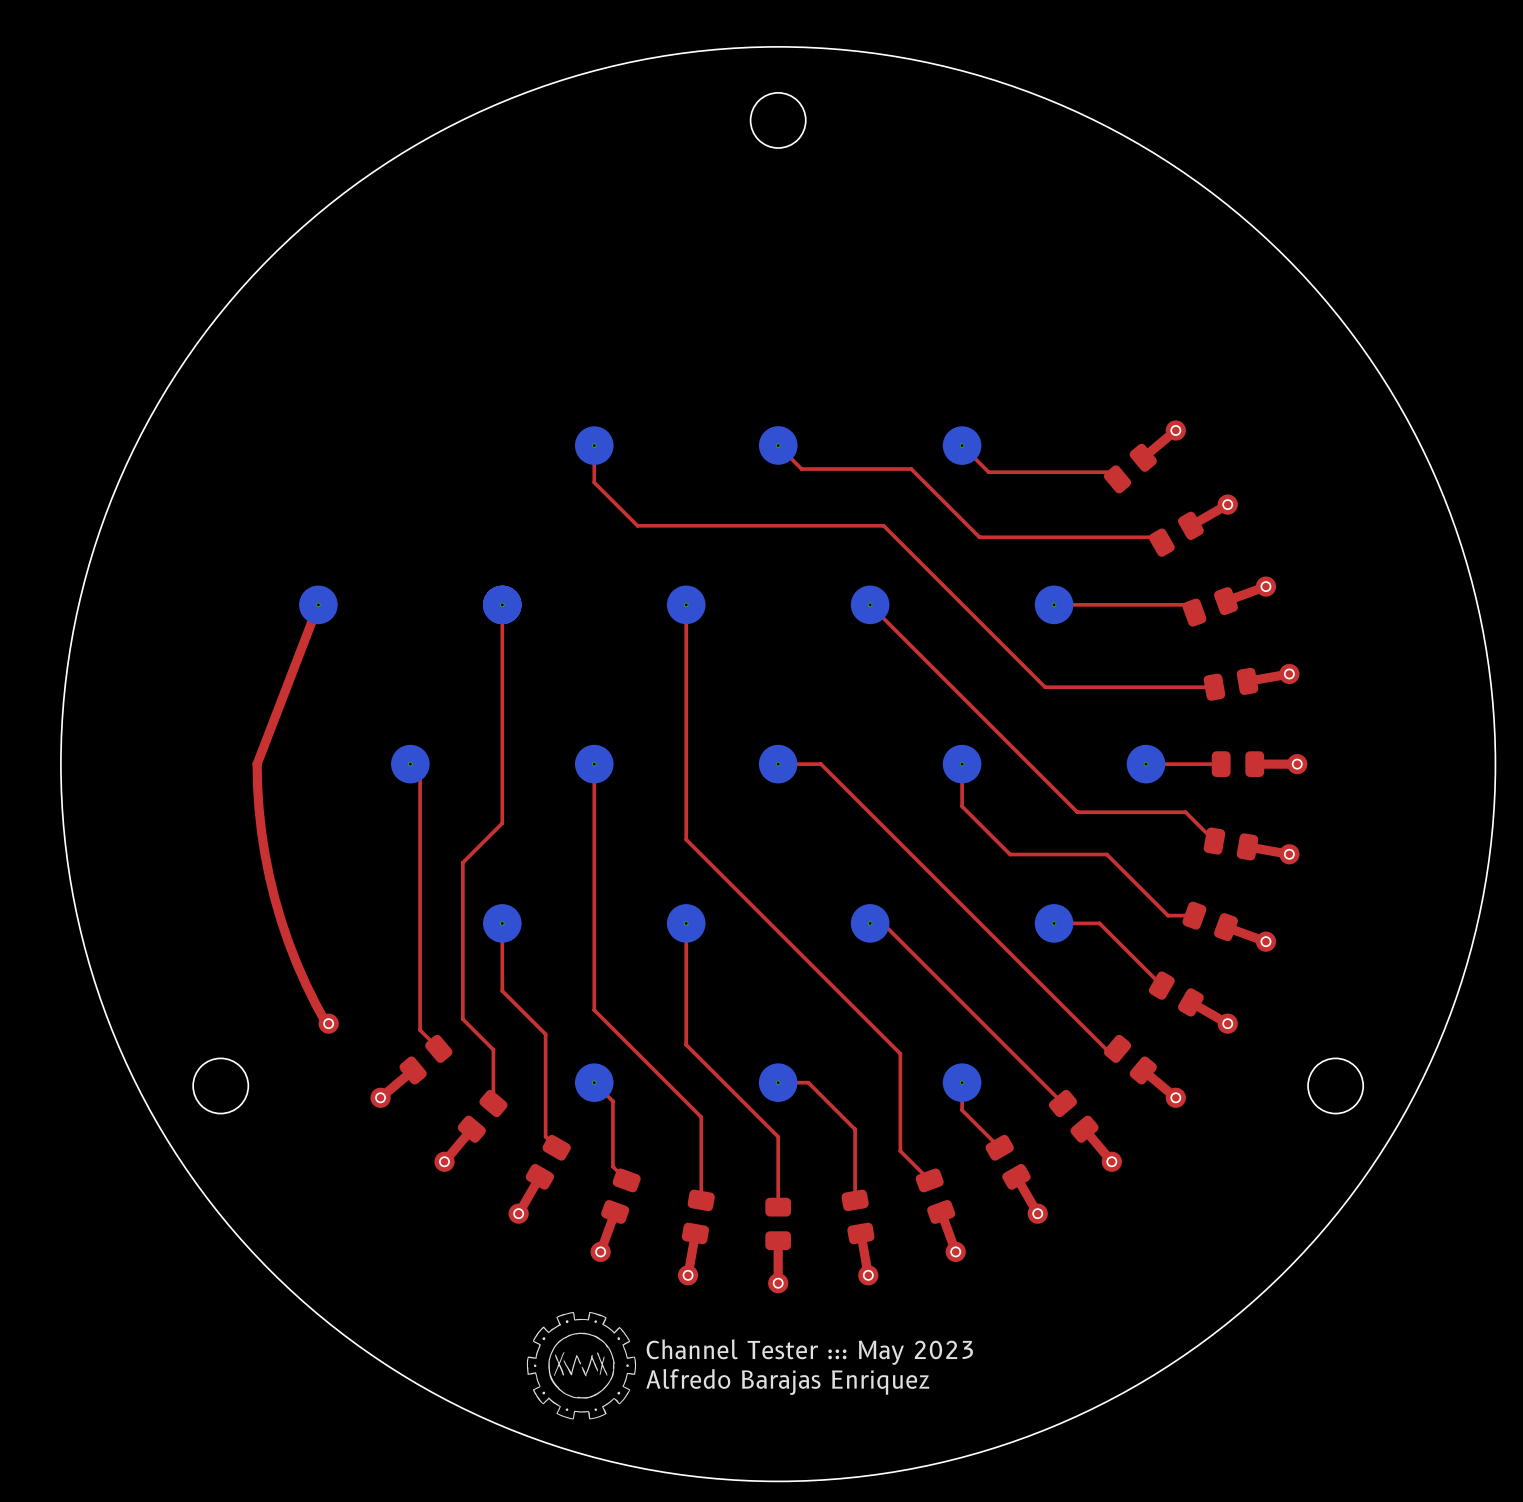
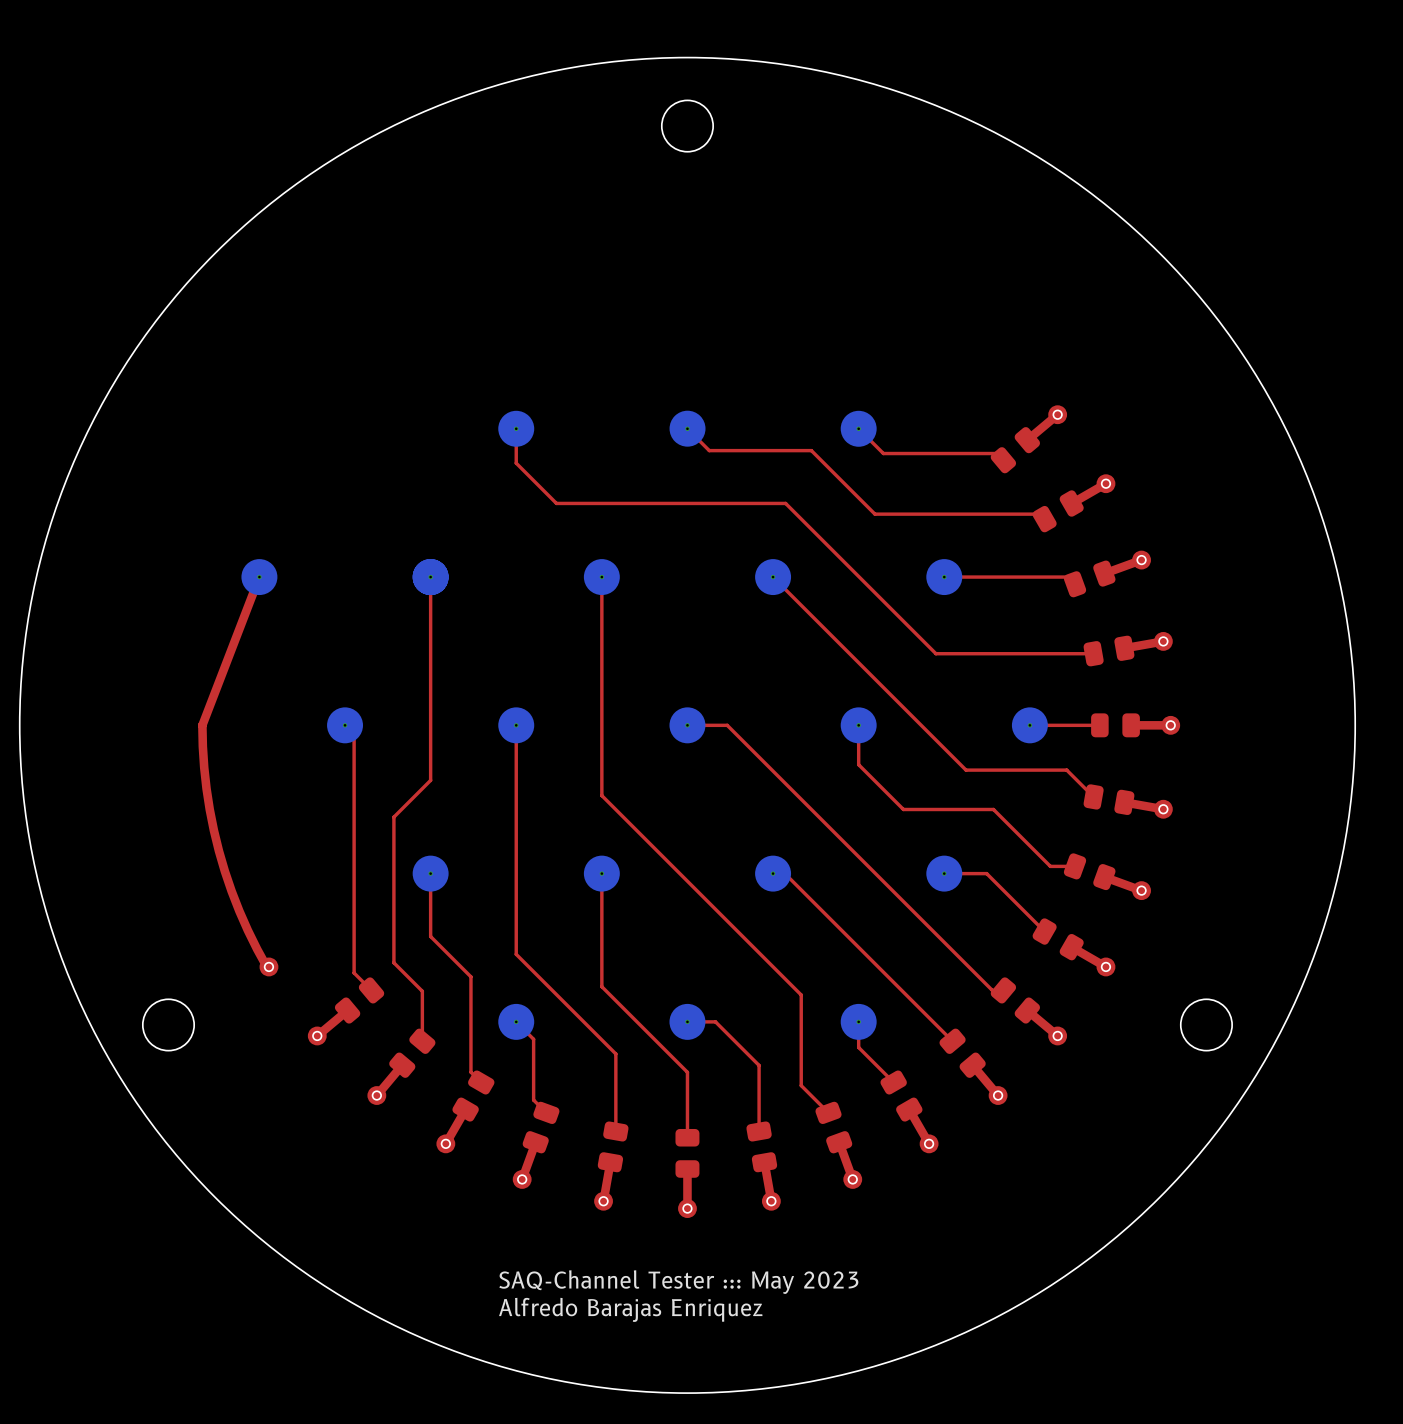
drawing: [526, 1311, 637, 1420] -> none
text: Channel Tester ::: May 2023 (809, 1352) -> SAQ-Channel Tester ::: May 2023 (678, 1282)
text position: Alfredo Barajas Enriquez (787, 1381) -> Alfredo Barajas Enriquez (630, 1309)

